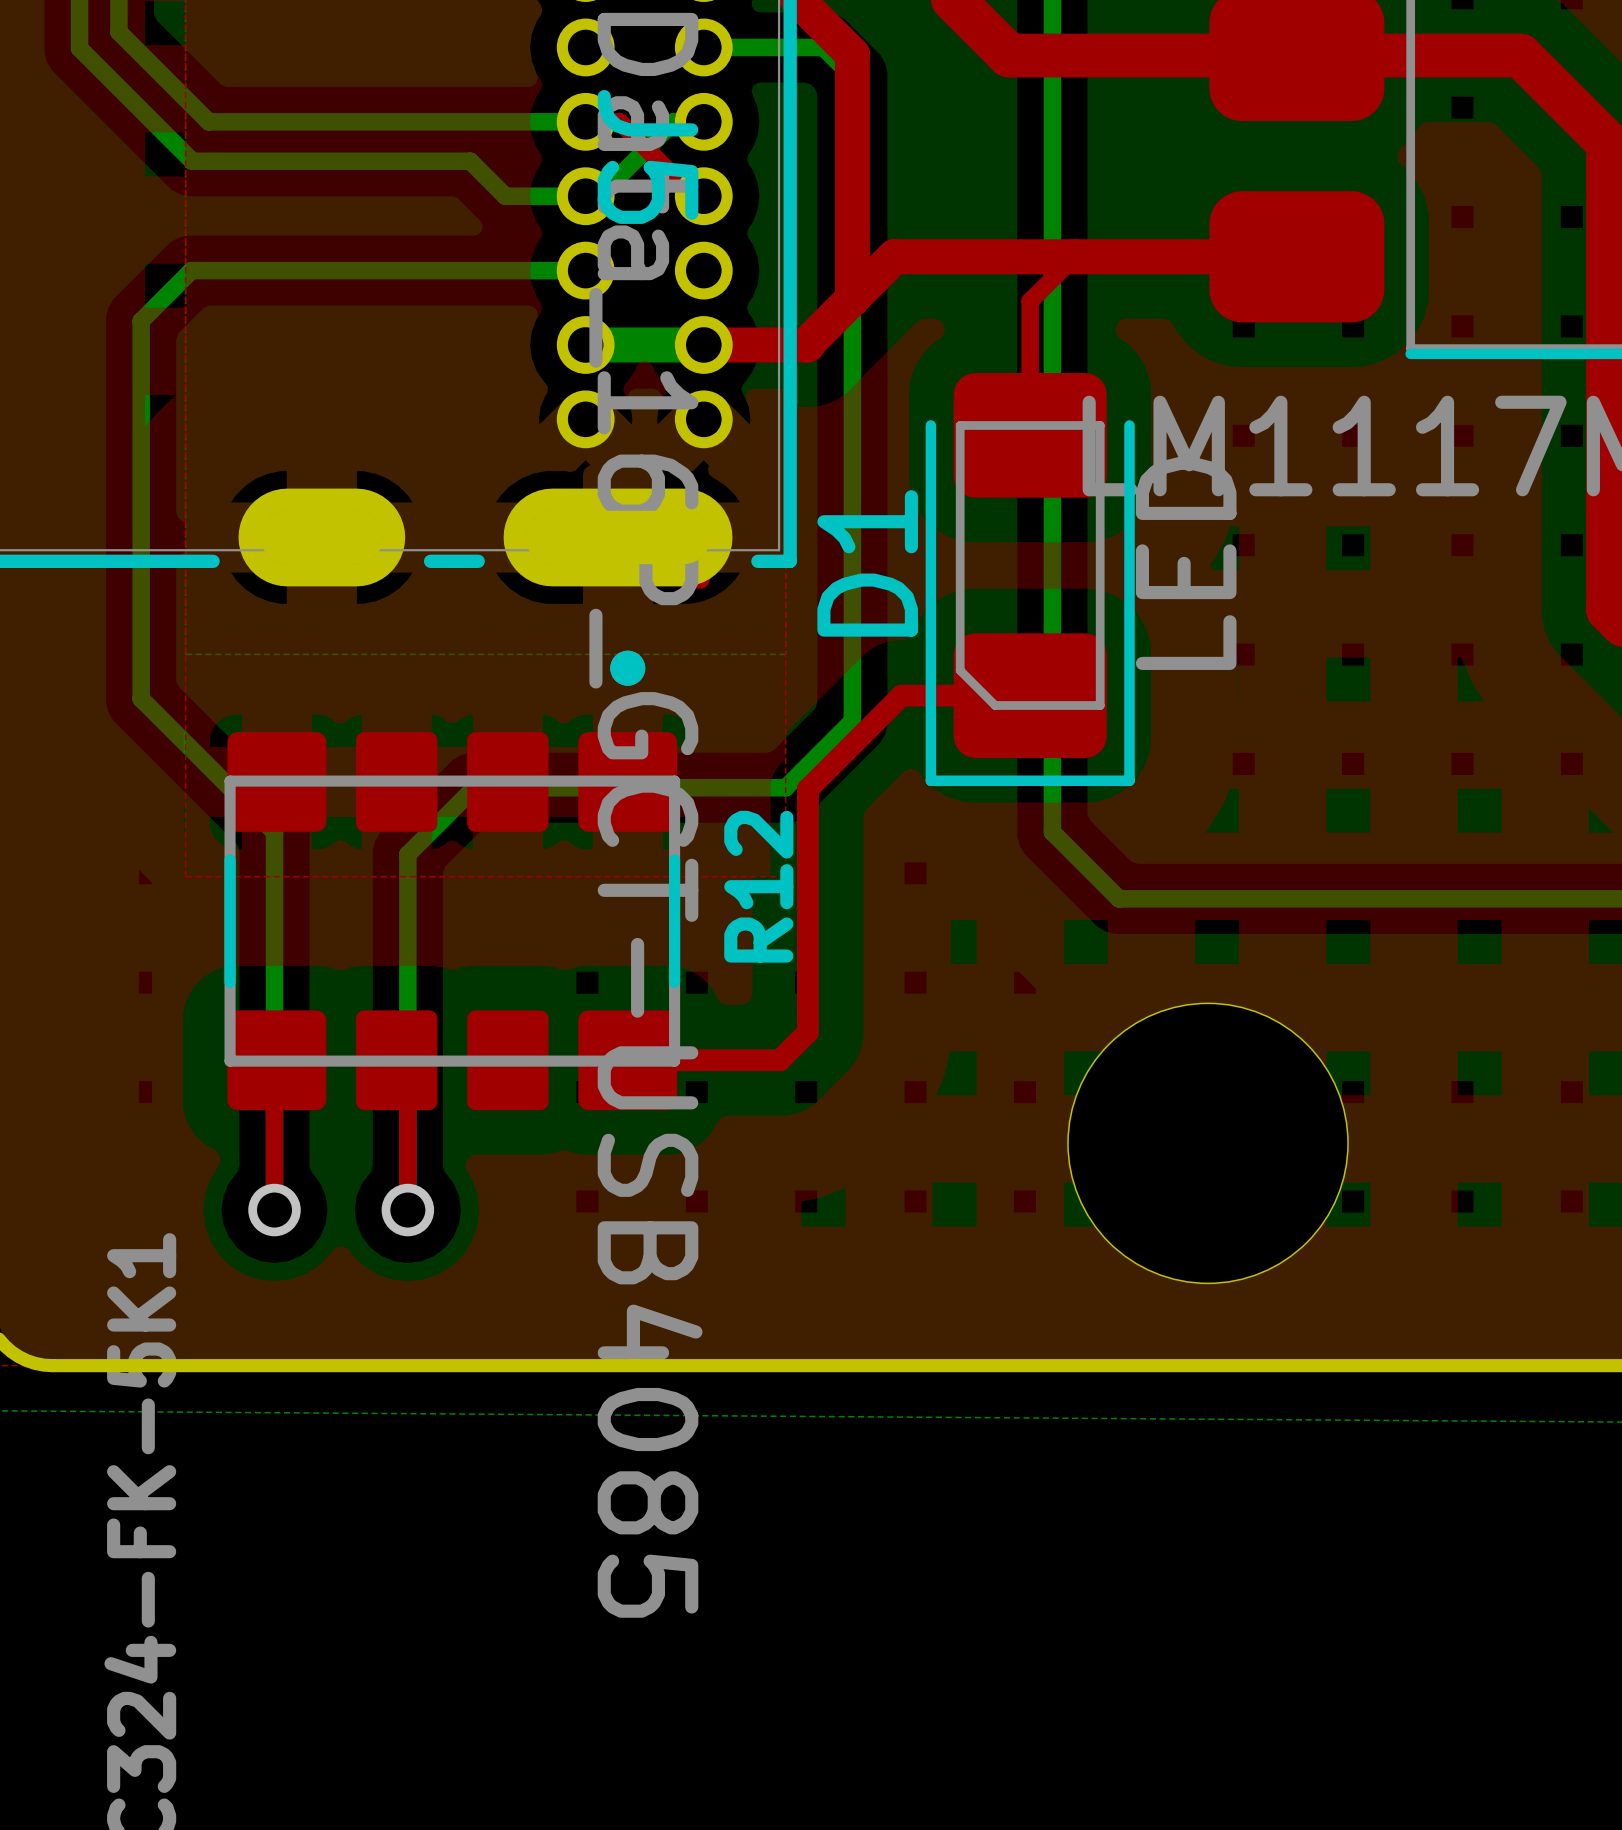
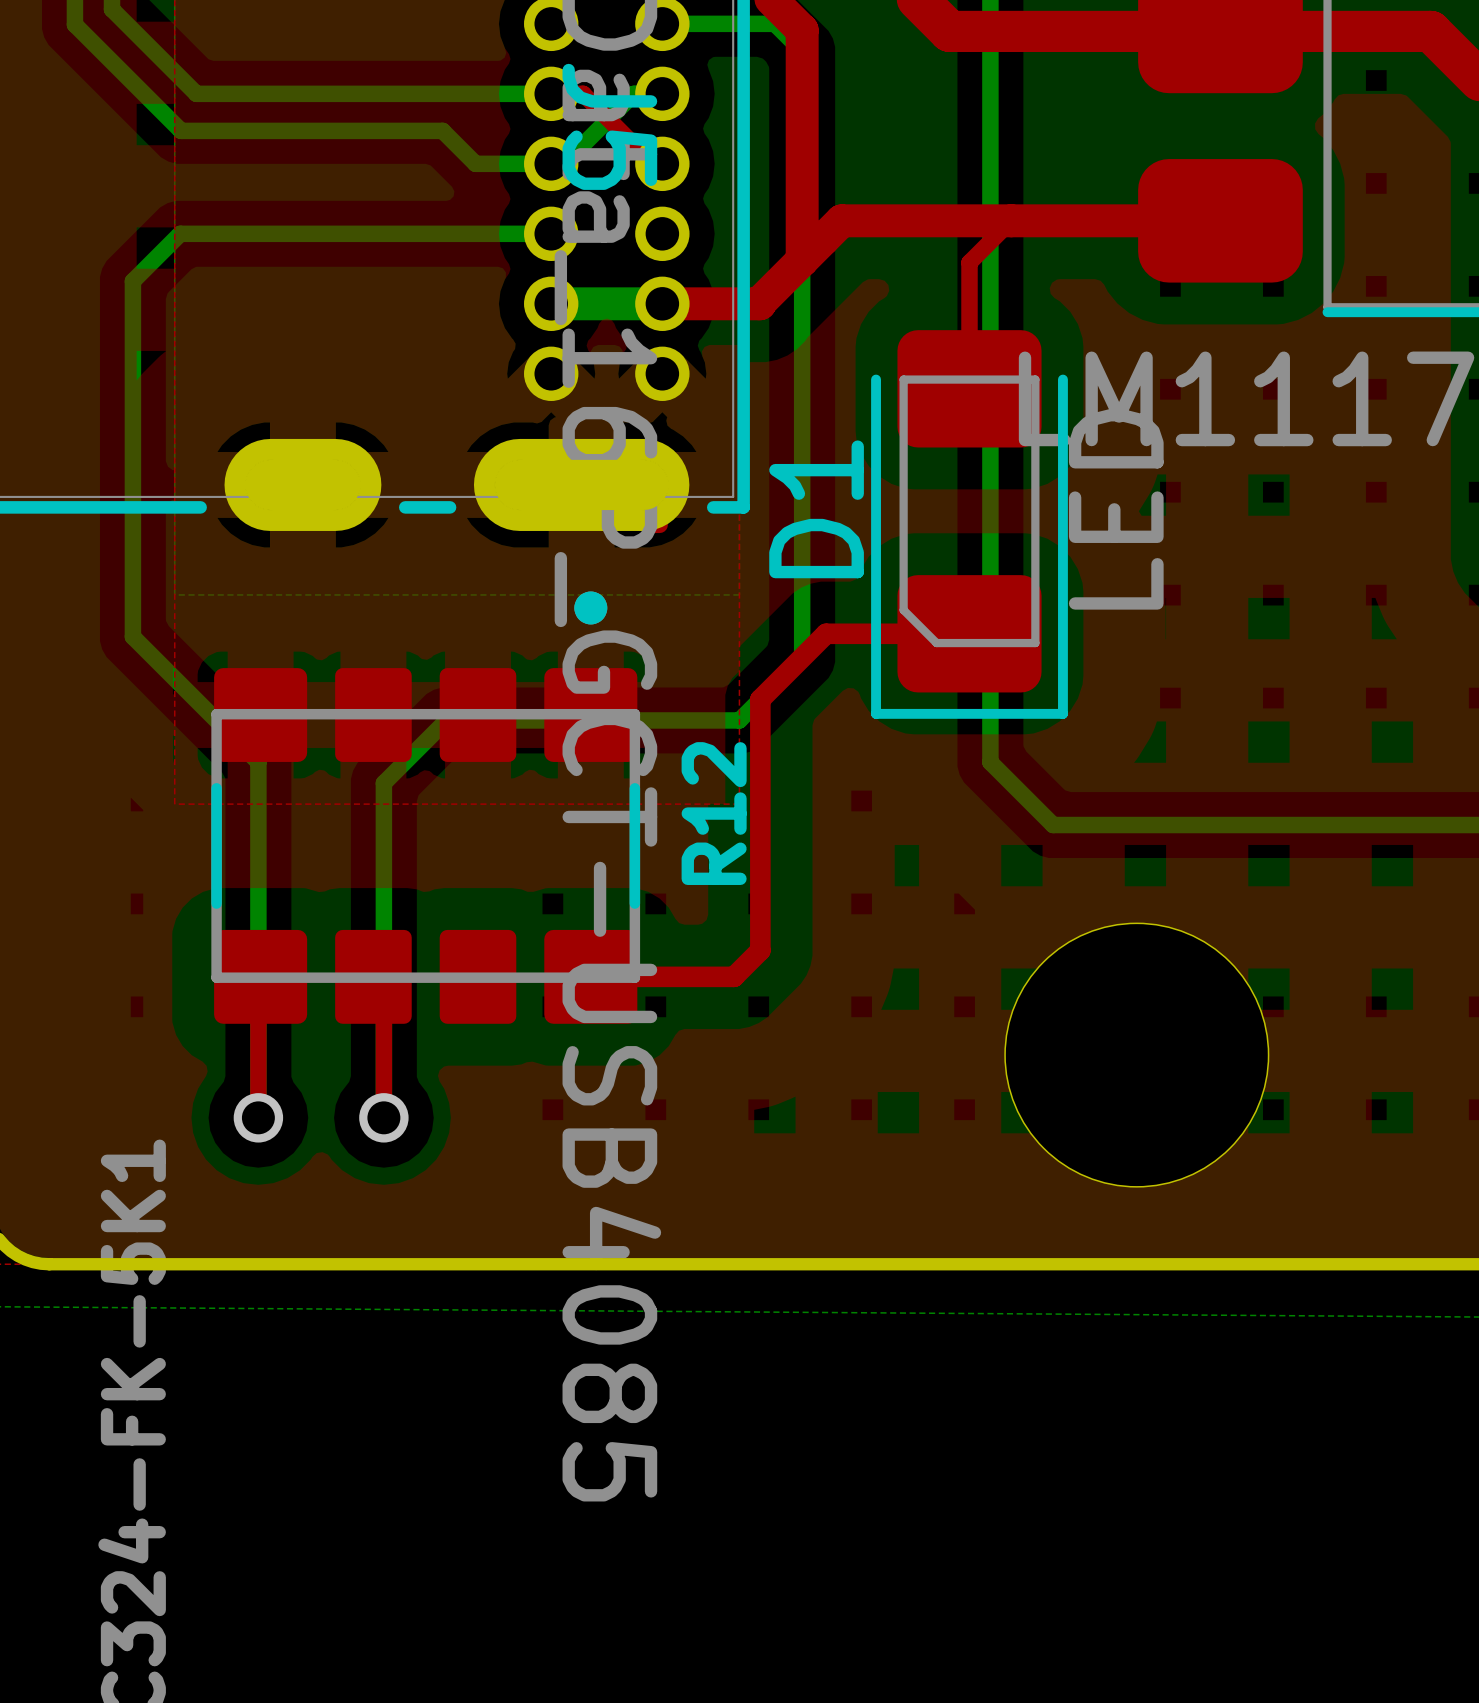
top track: (901, 695) (807, 789) -> (848, 633) (826, 633) (760, 699) (760, 721)

